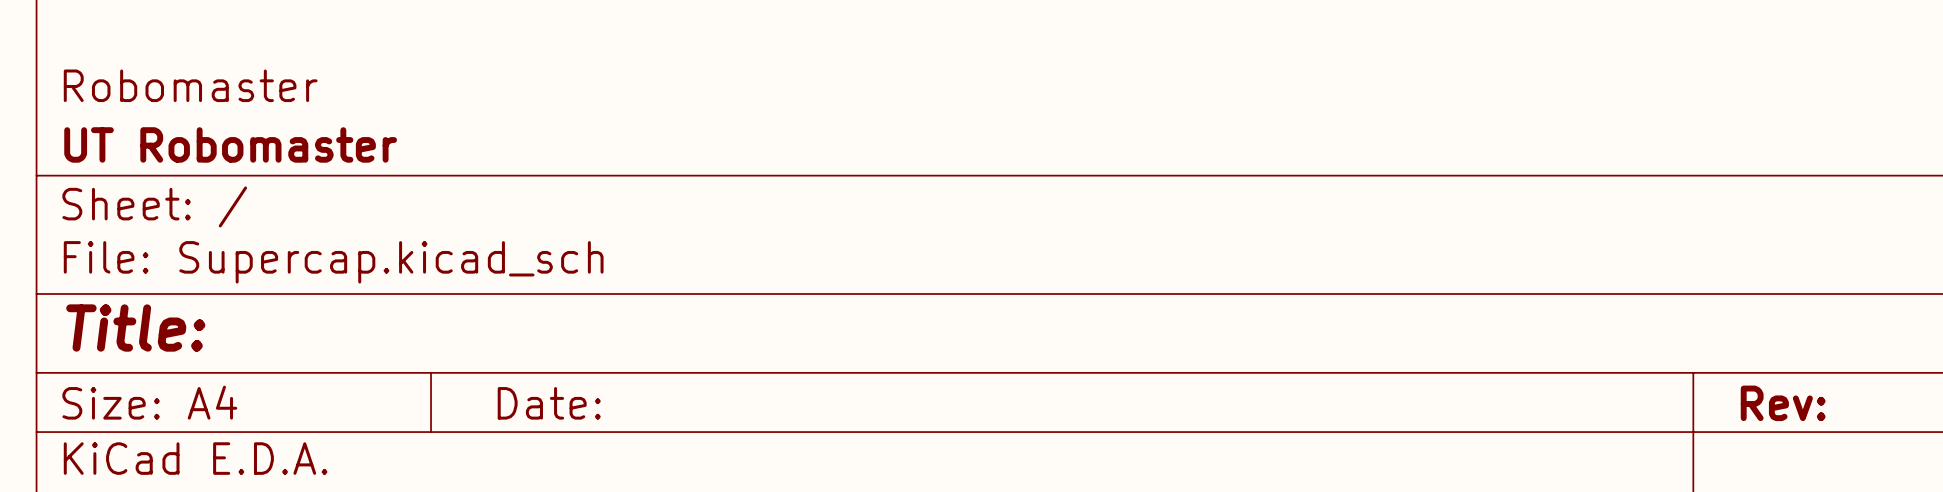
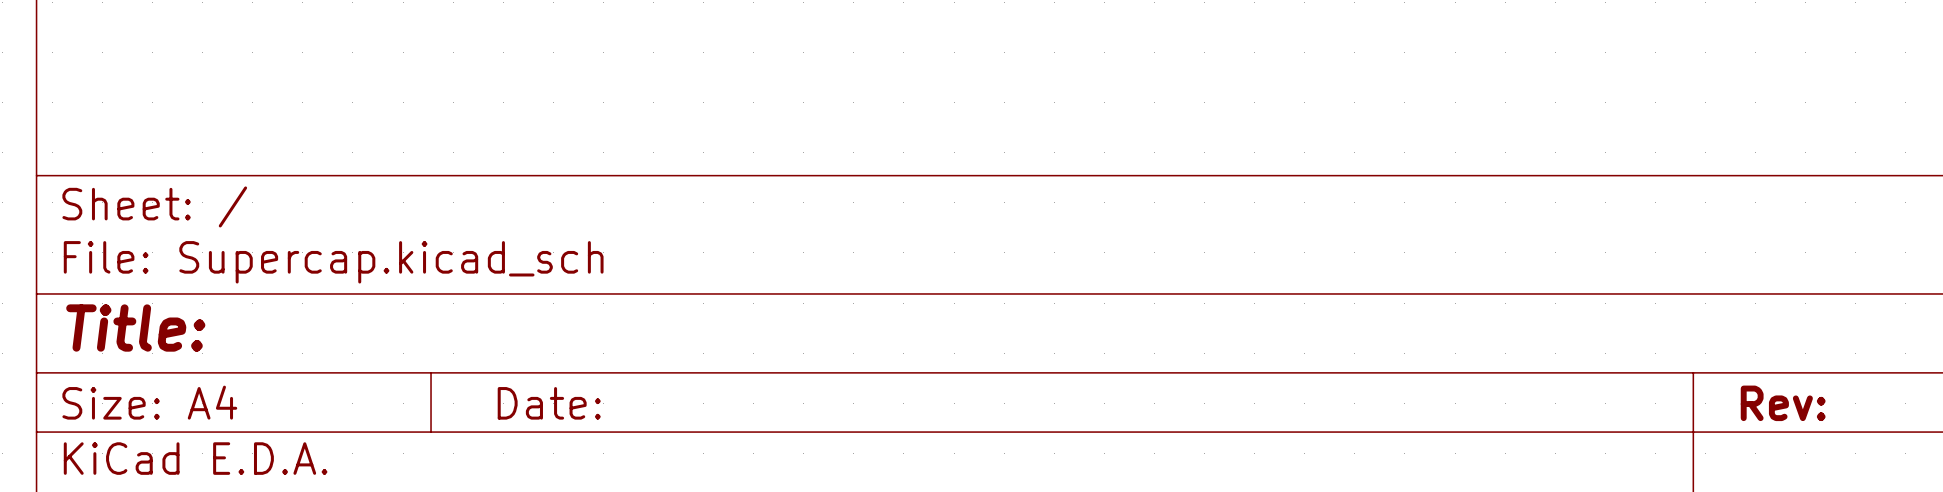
title block: Robomaster (190, 85) -> none
title block: UT Robomaster (230, 144) -> none

